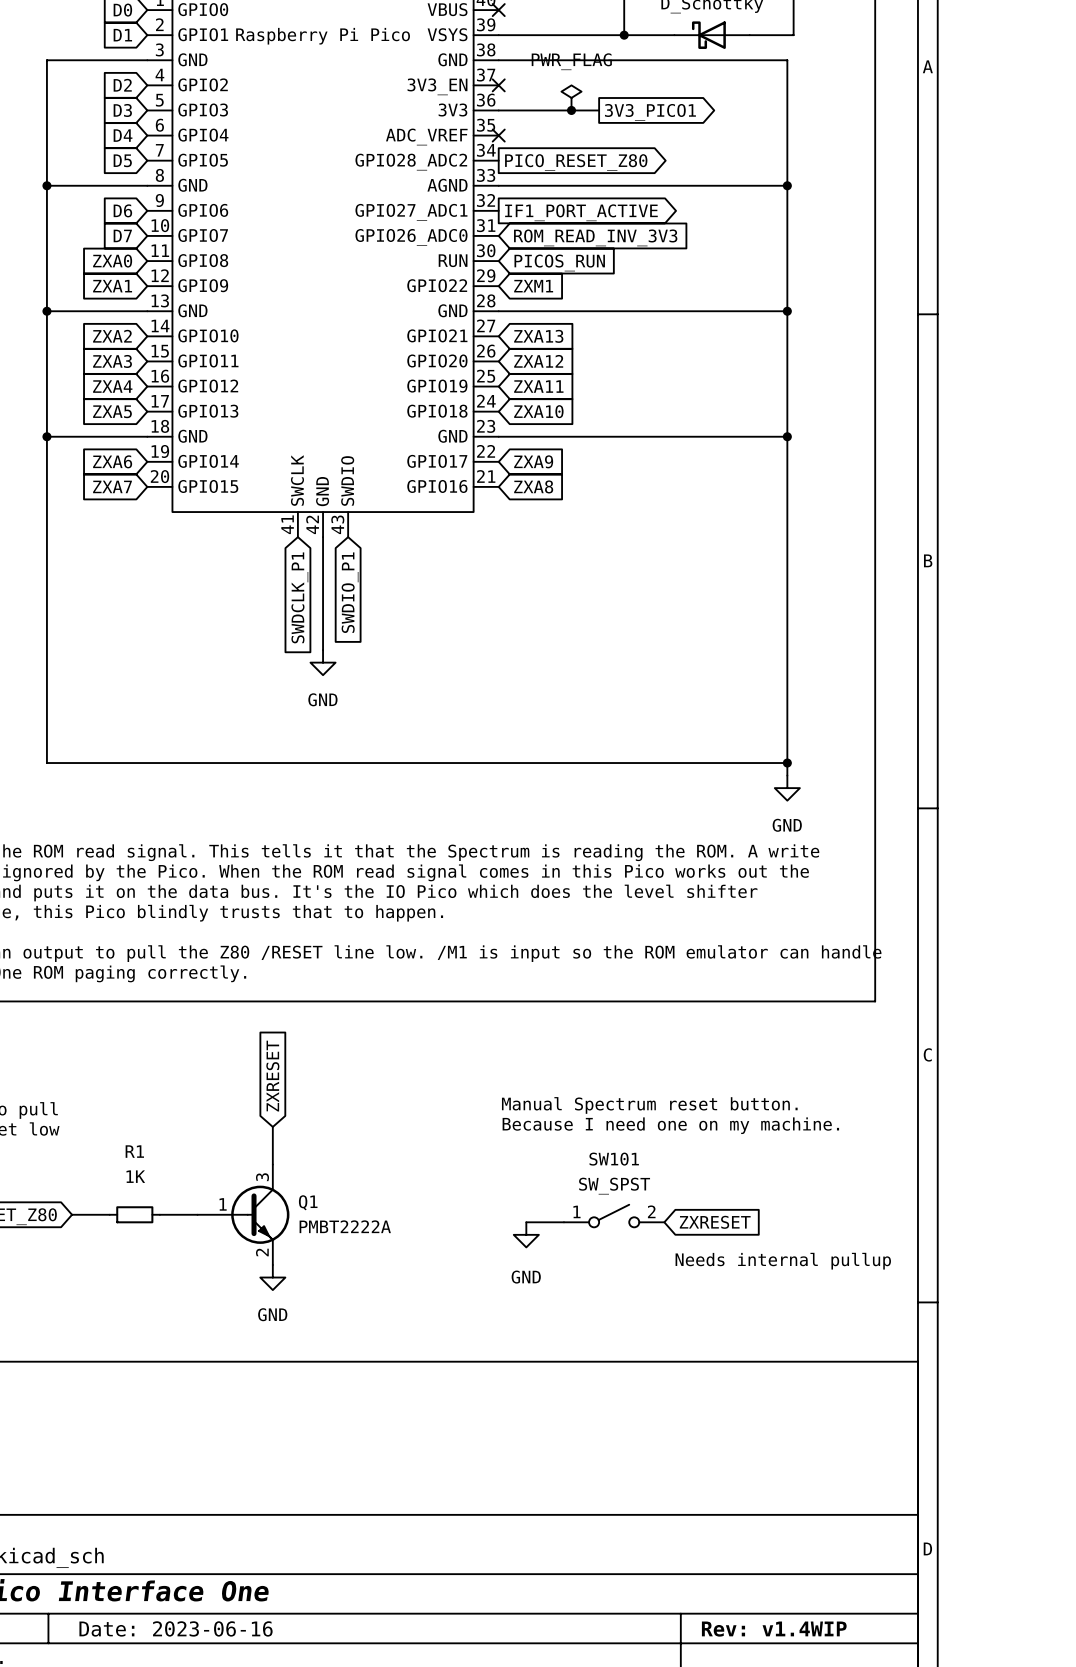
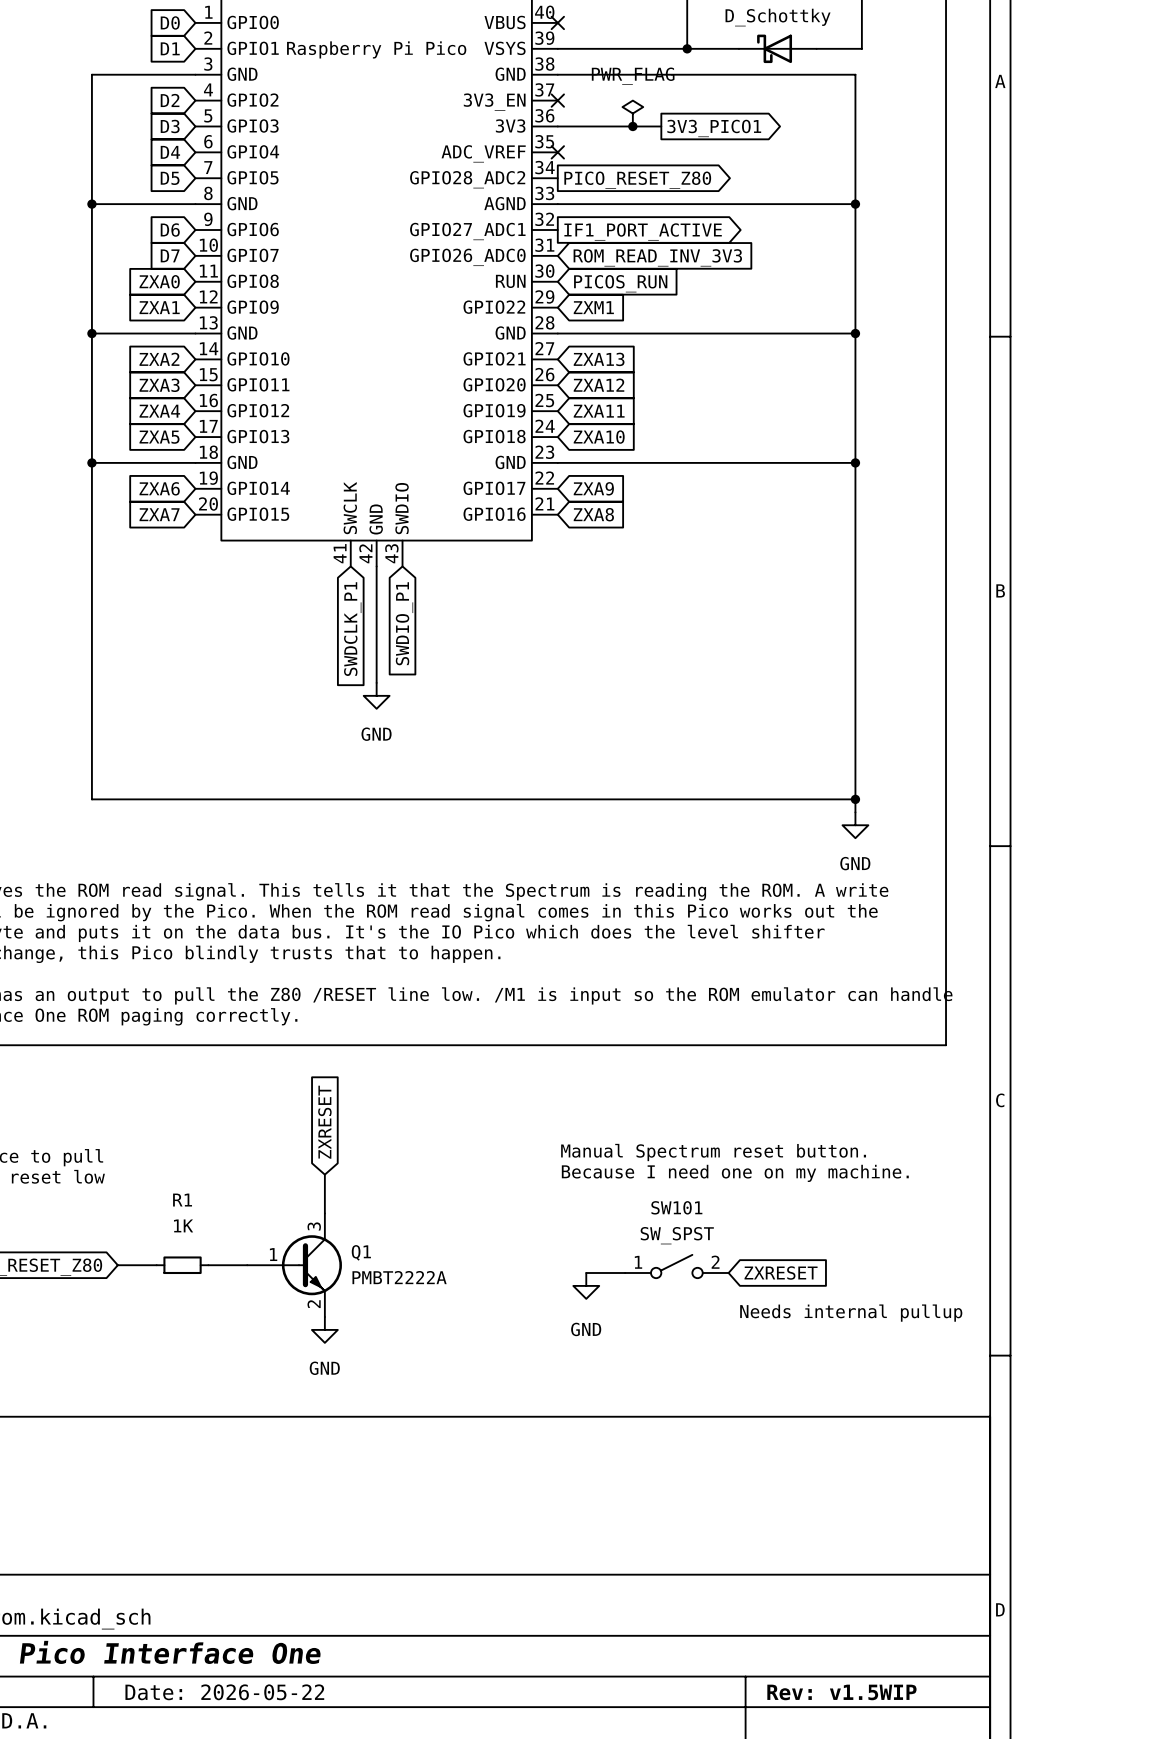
title block: Date: 2023-06-16 (176, 1628) -> Date: 2026-05-22 (224, 1692)
title block: Rev: v1.4WIP (774, 1629) -> Rev: v1.5WIP (841, 1692)

